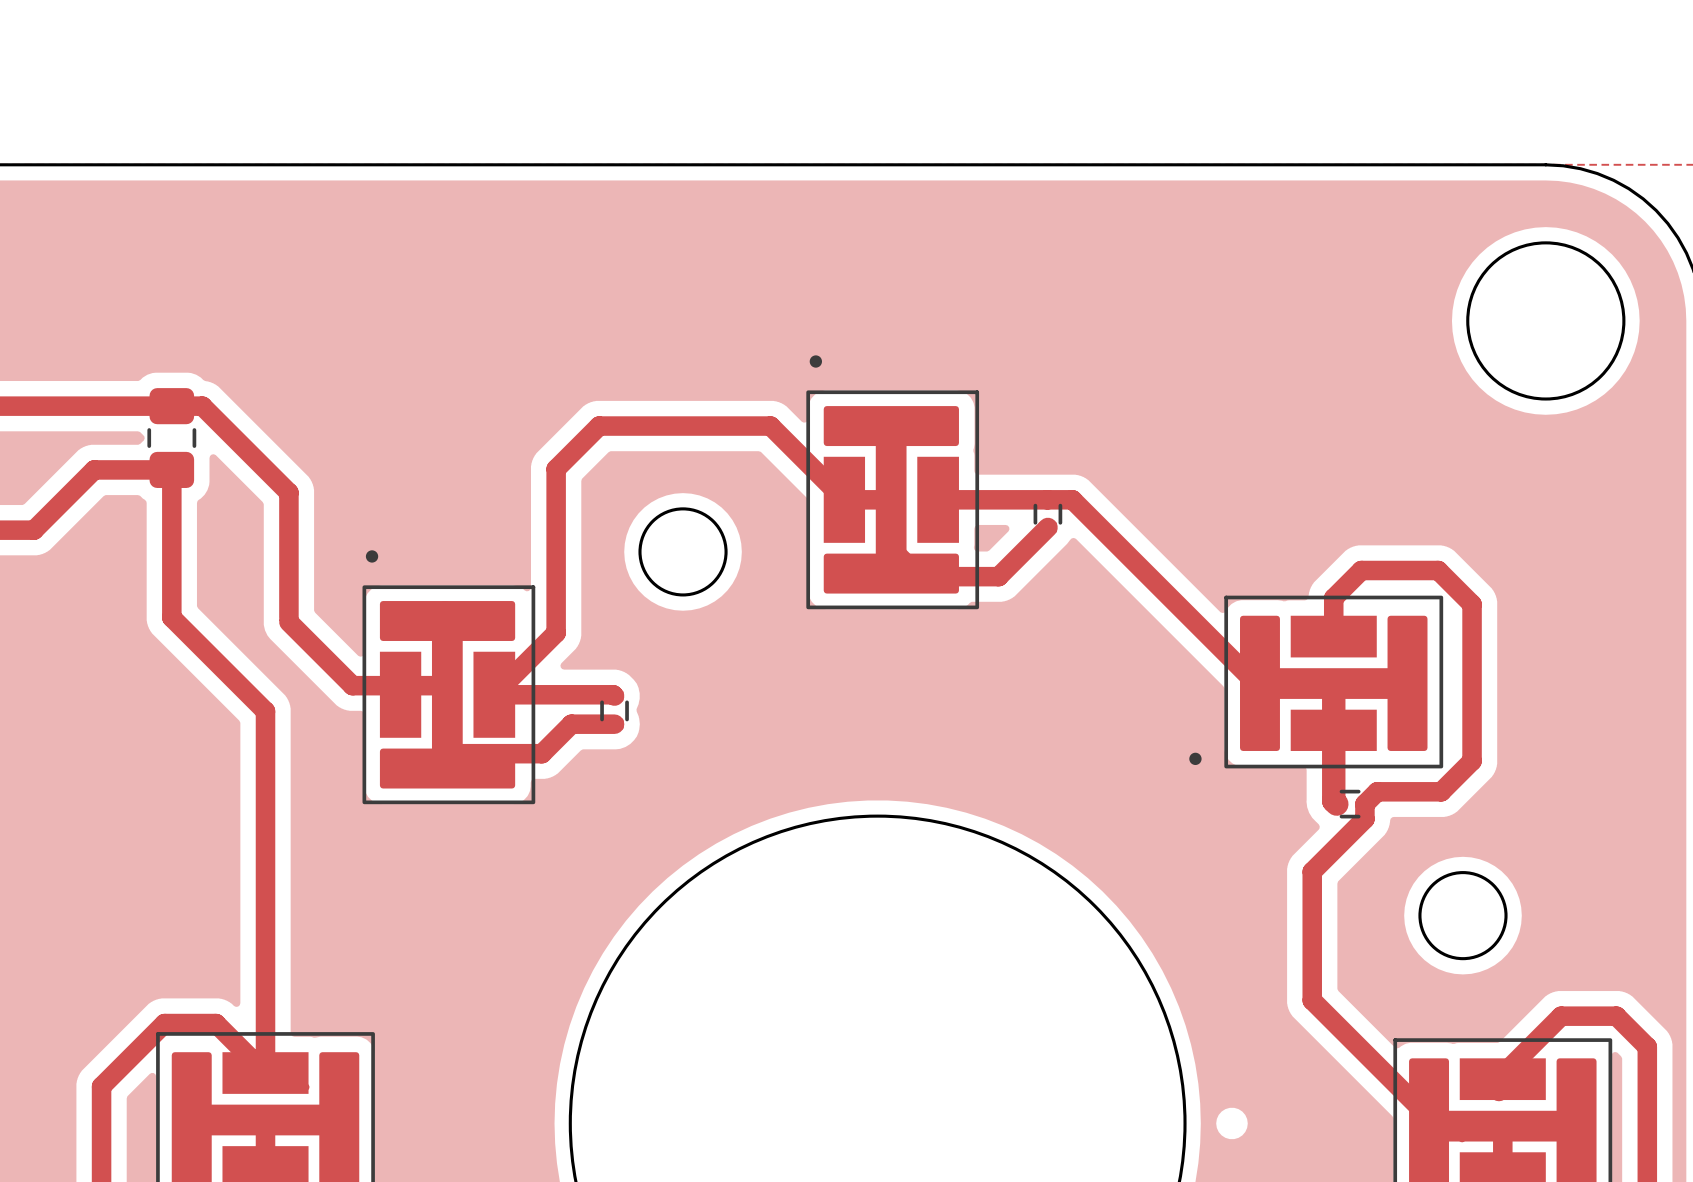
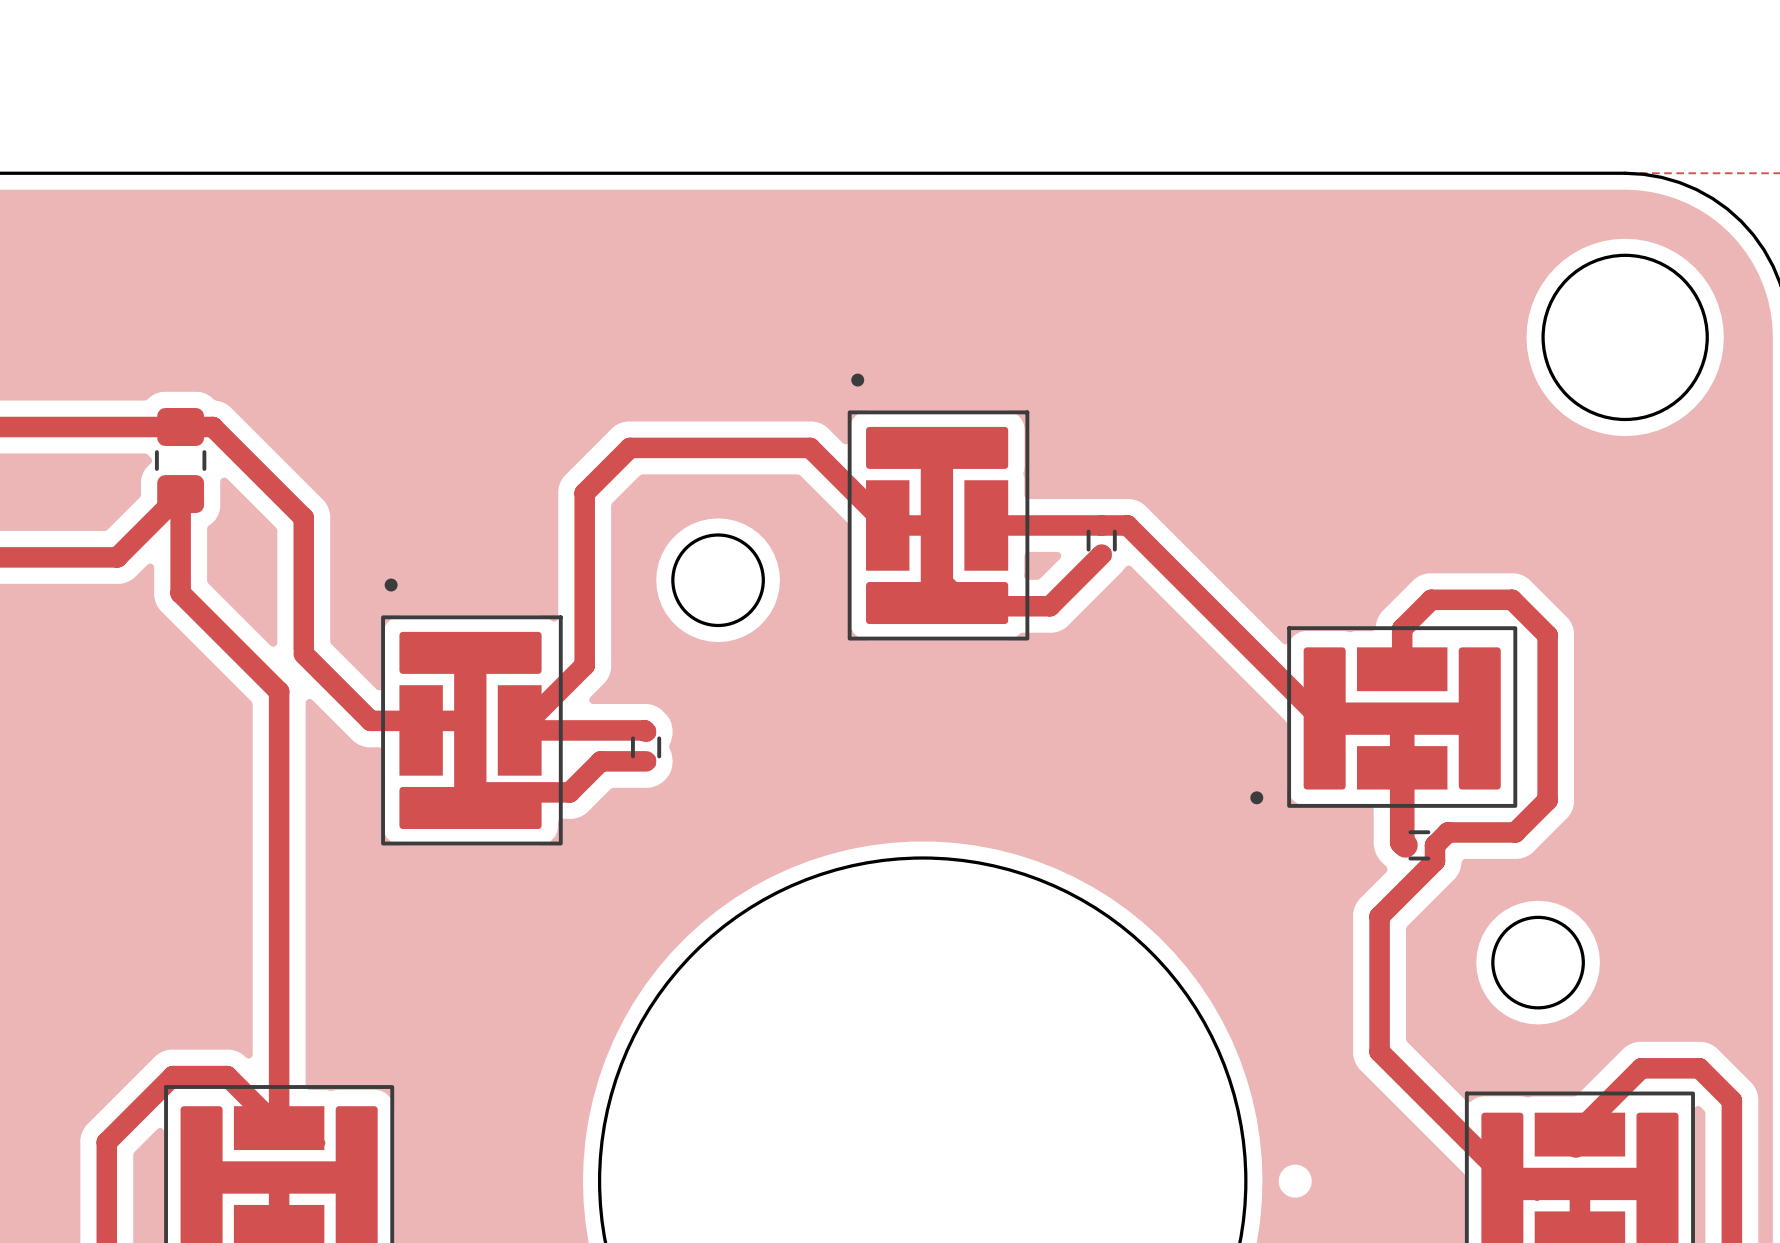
top track: (171, 469) (94, 469) (34, 530) -> (180, 494) (117, 557) (35, 557)
top track: (171, 564) (171, 617) (265, 711) -> (180, 593) (279, 691) (279, 747)

